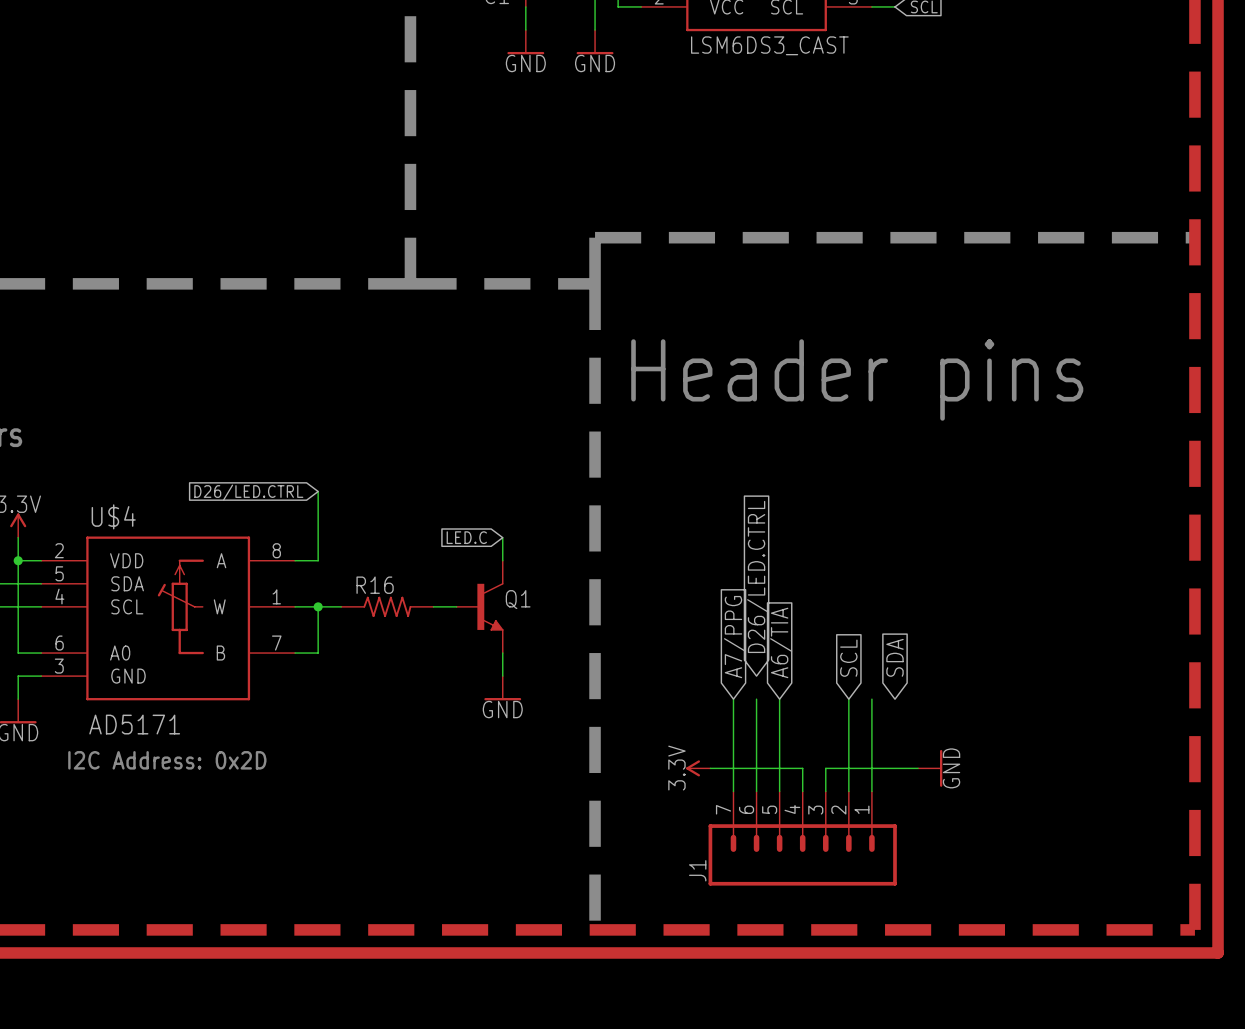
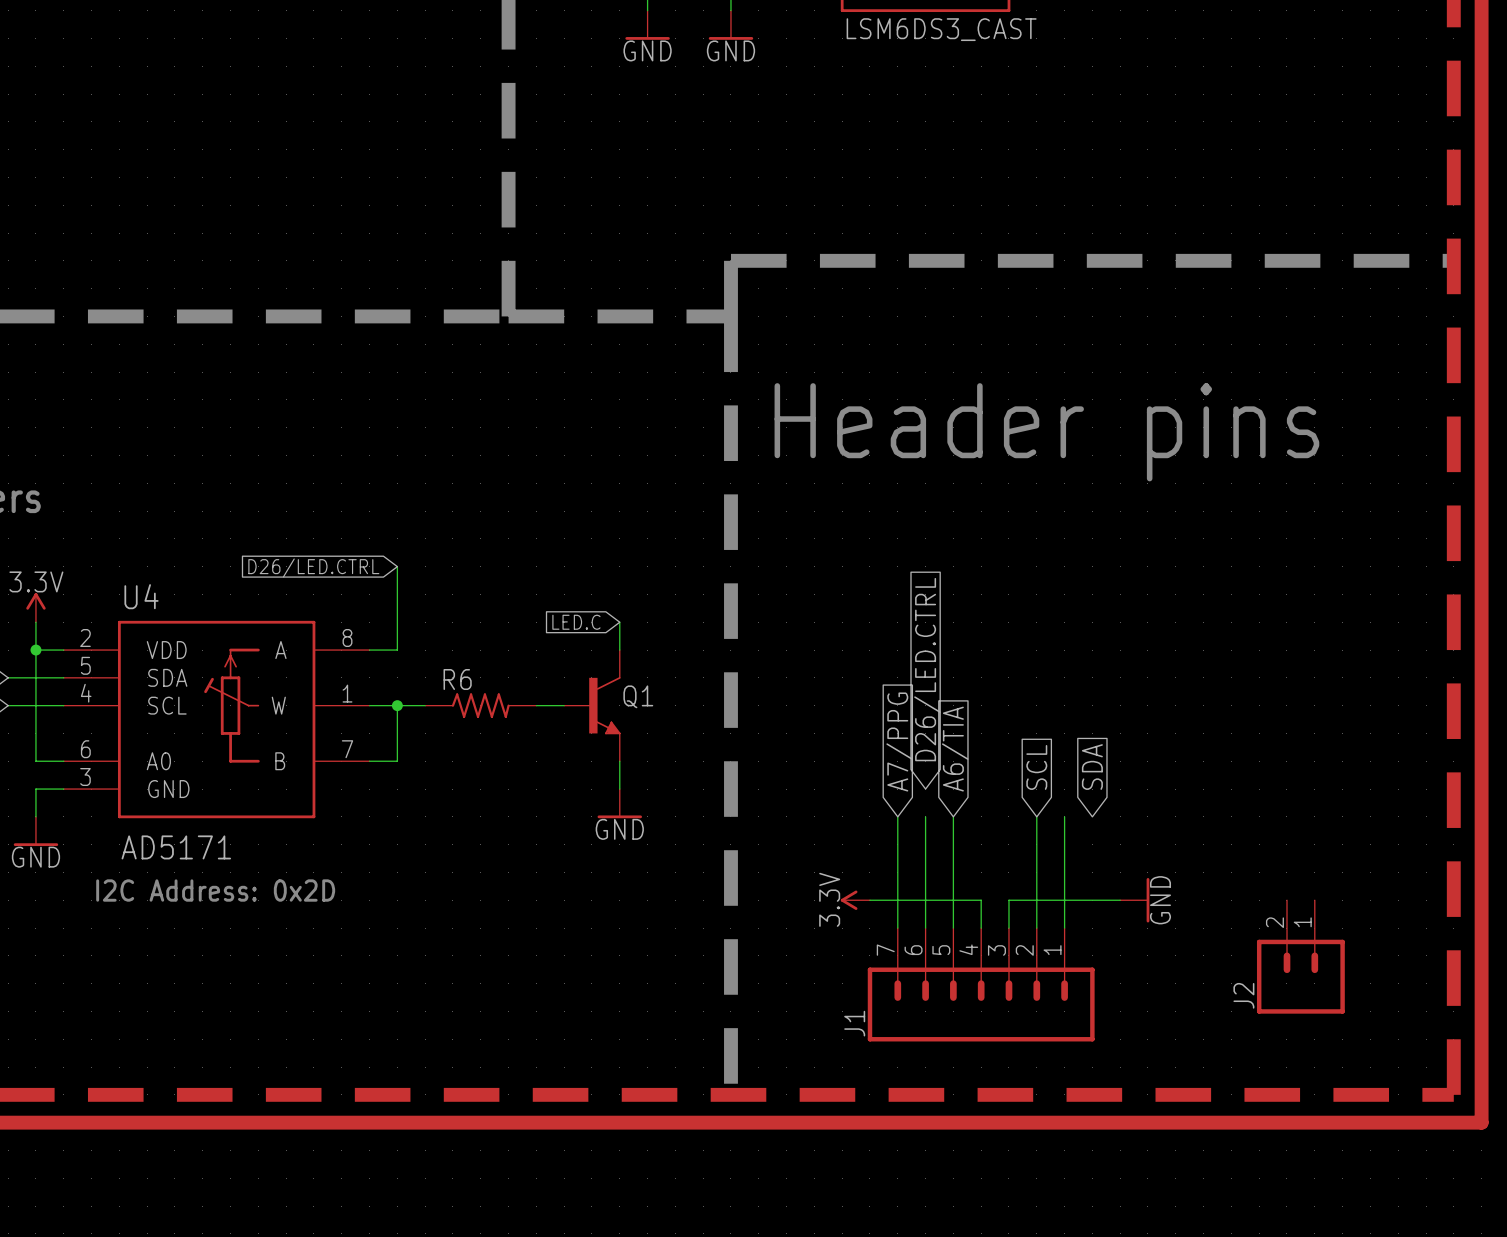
U$4 name: U$4 (113, 516) -> U4 (141, 596)
R16 name: R16 (375, 585) -> R6 (457, 679)
J2: none -> (1300, 956)

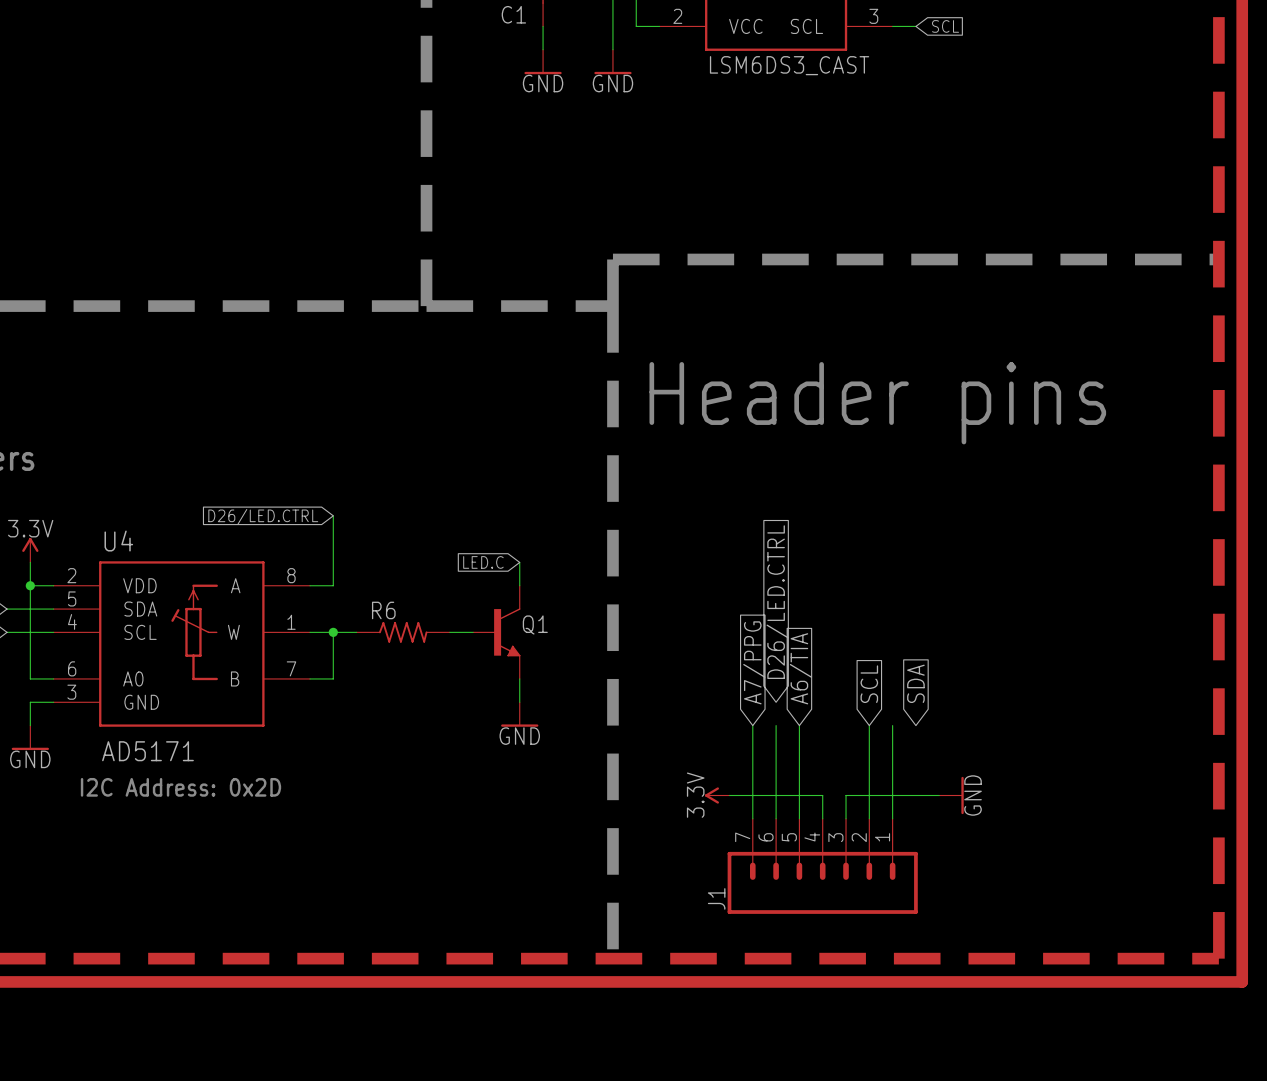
J2: (1300, 956) -> none

